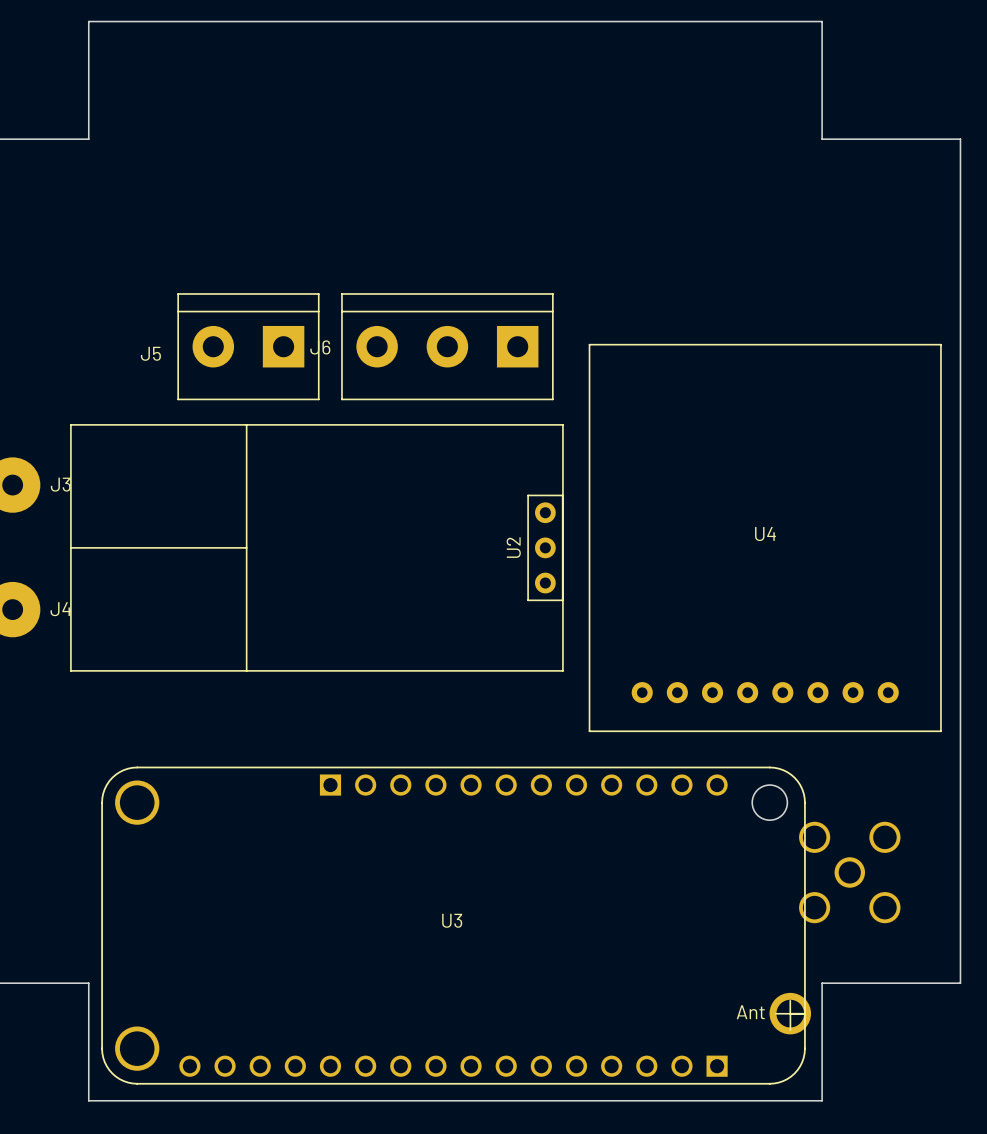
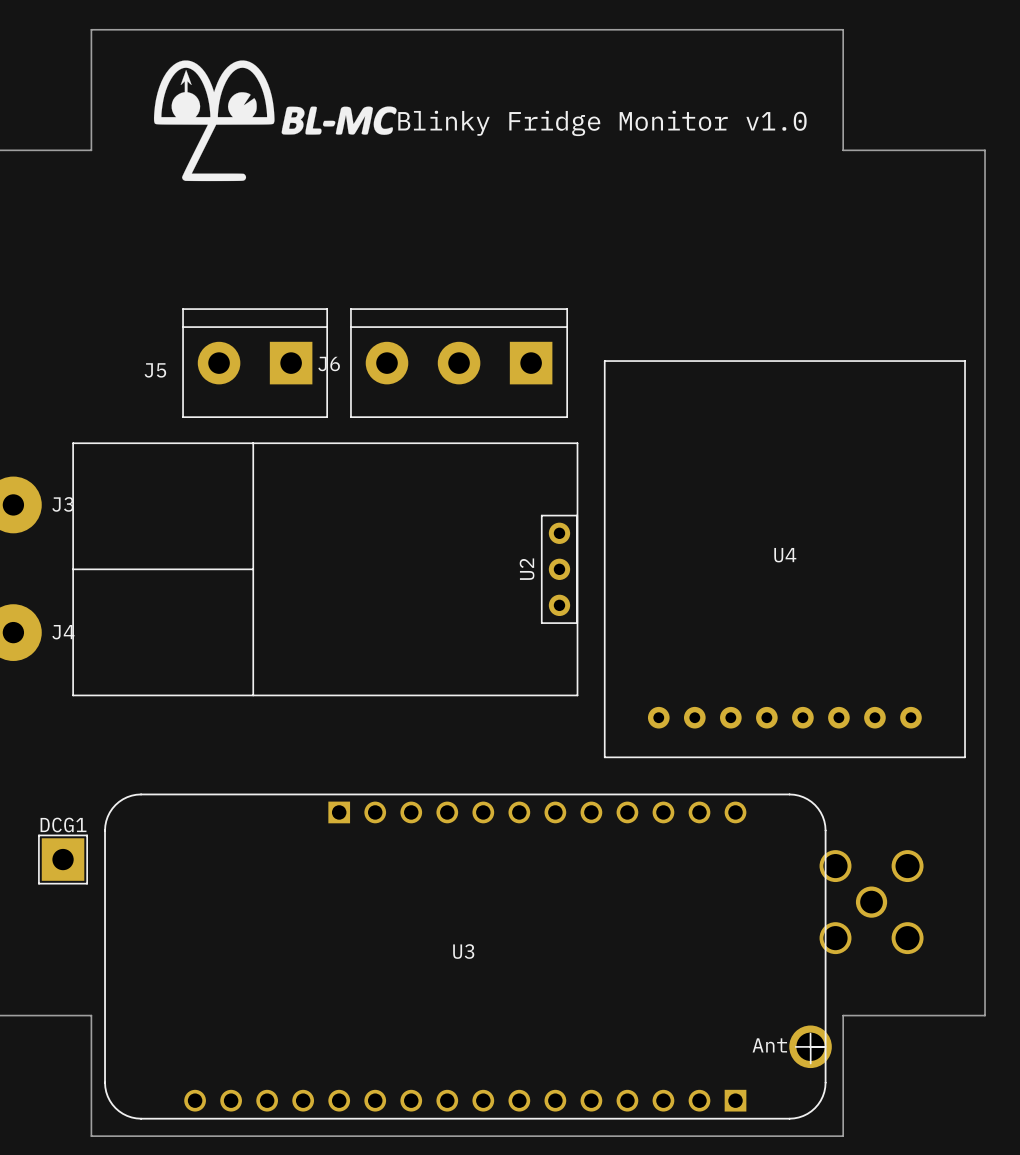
drawing: none -> [153, 60, 397, 182]
text: none -> Blinky Fridge Monitor v1.0 (602, 123)
U3 footprint: [101, 766, 806, 1085] -> [104, 793, 827, 1120]
DCG1: none -> (63, 859)

